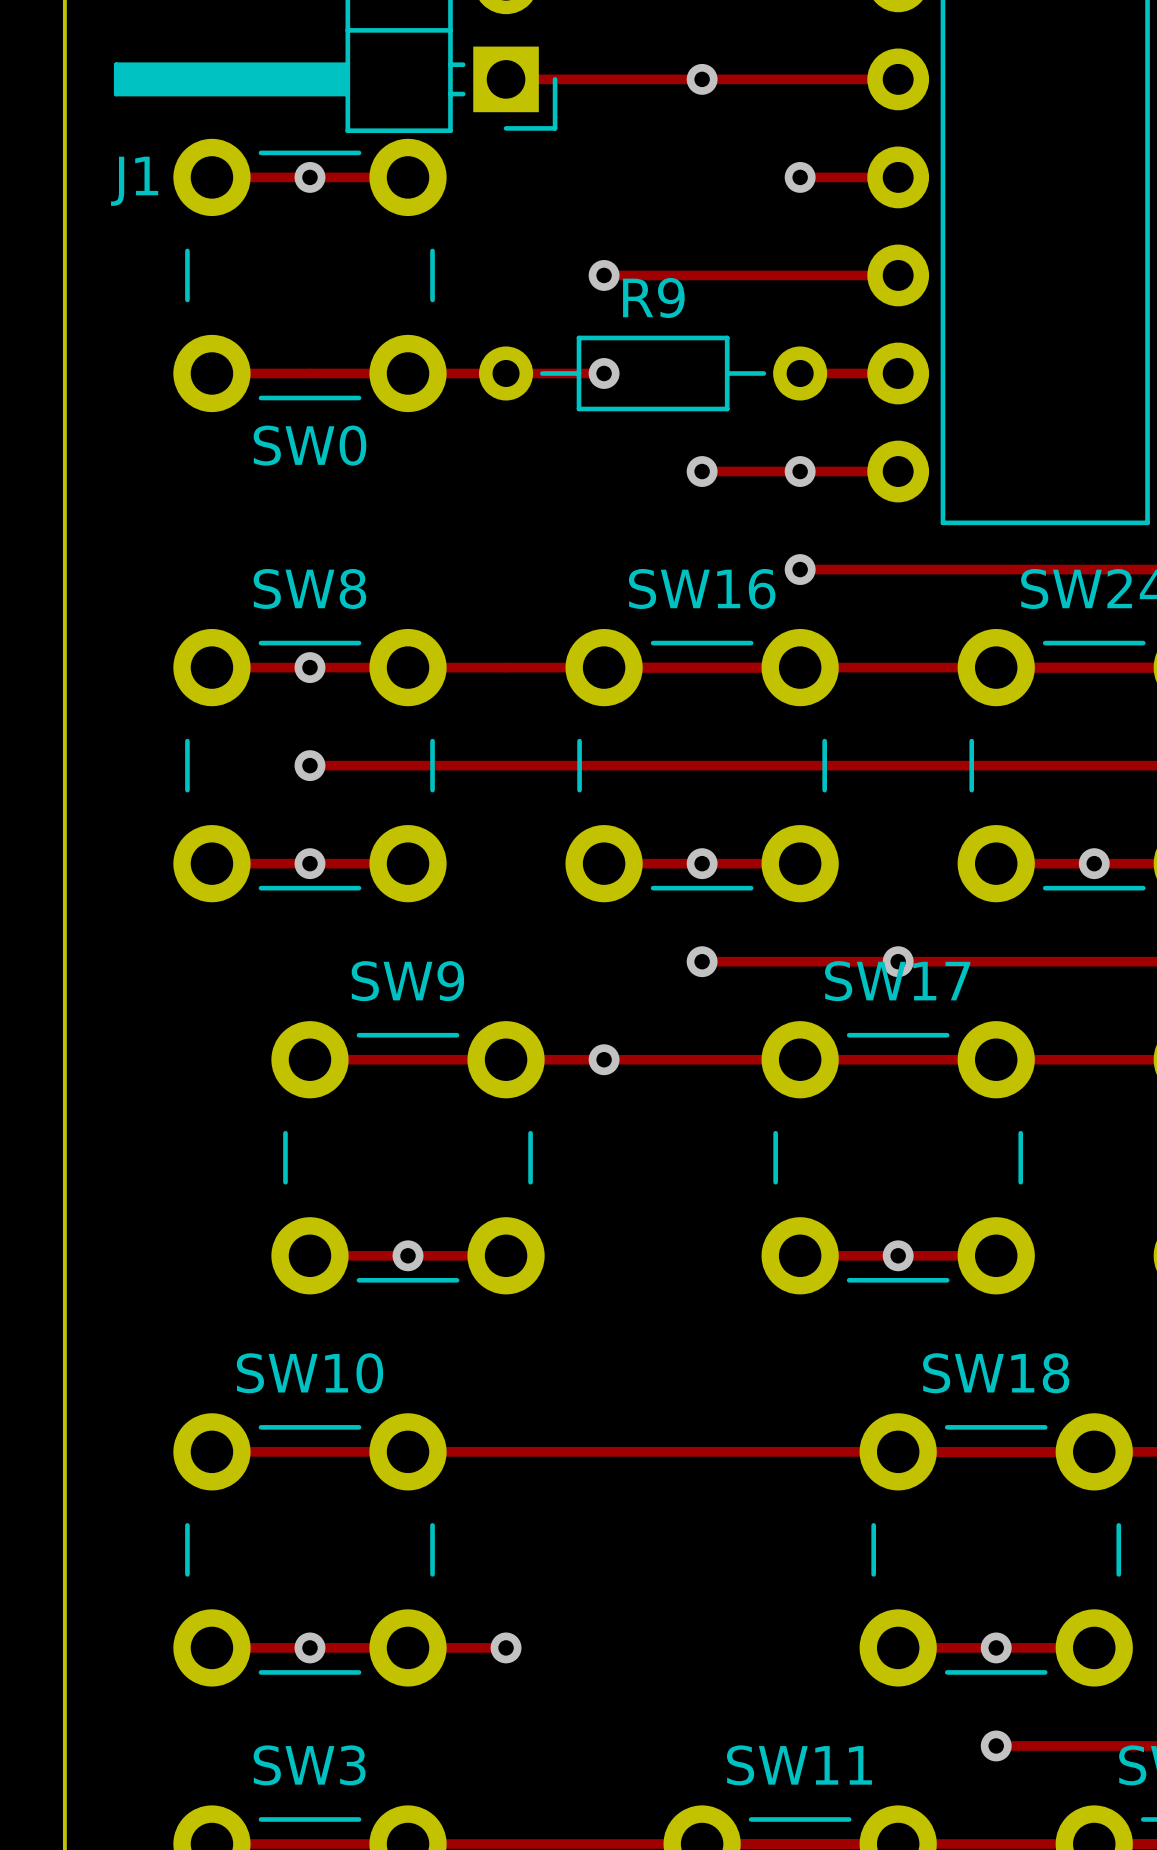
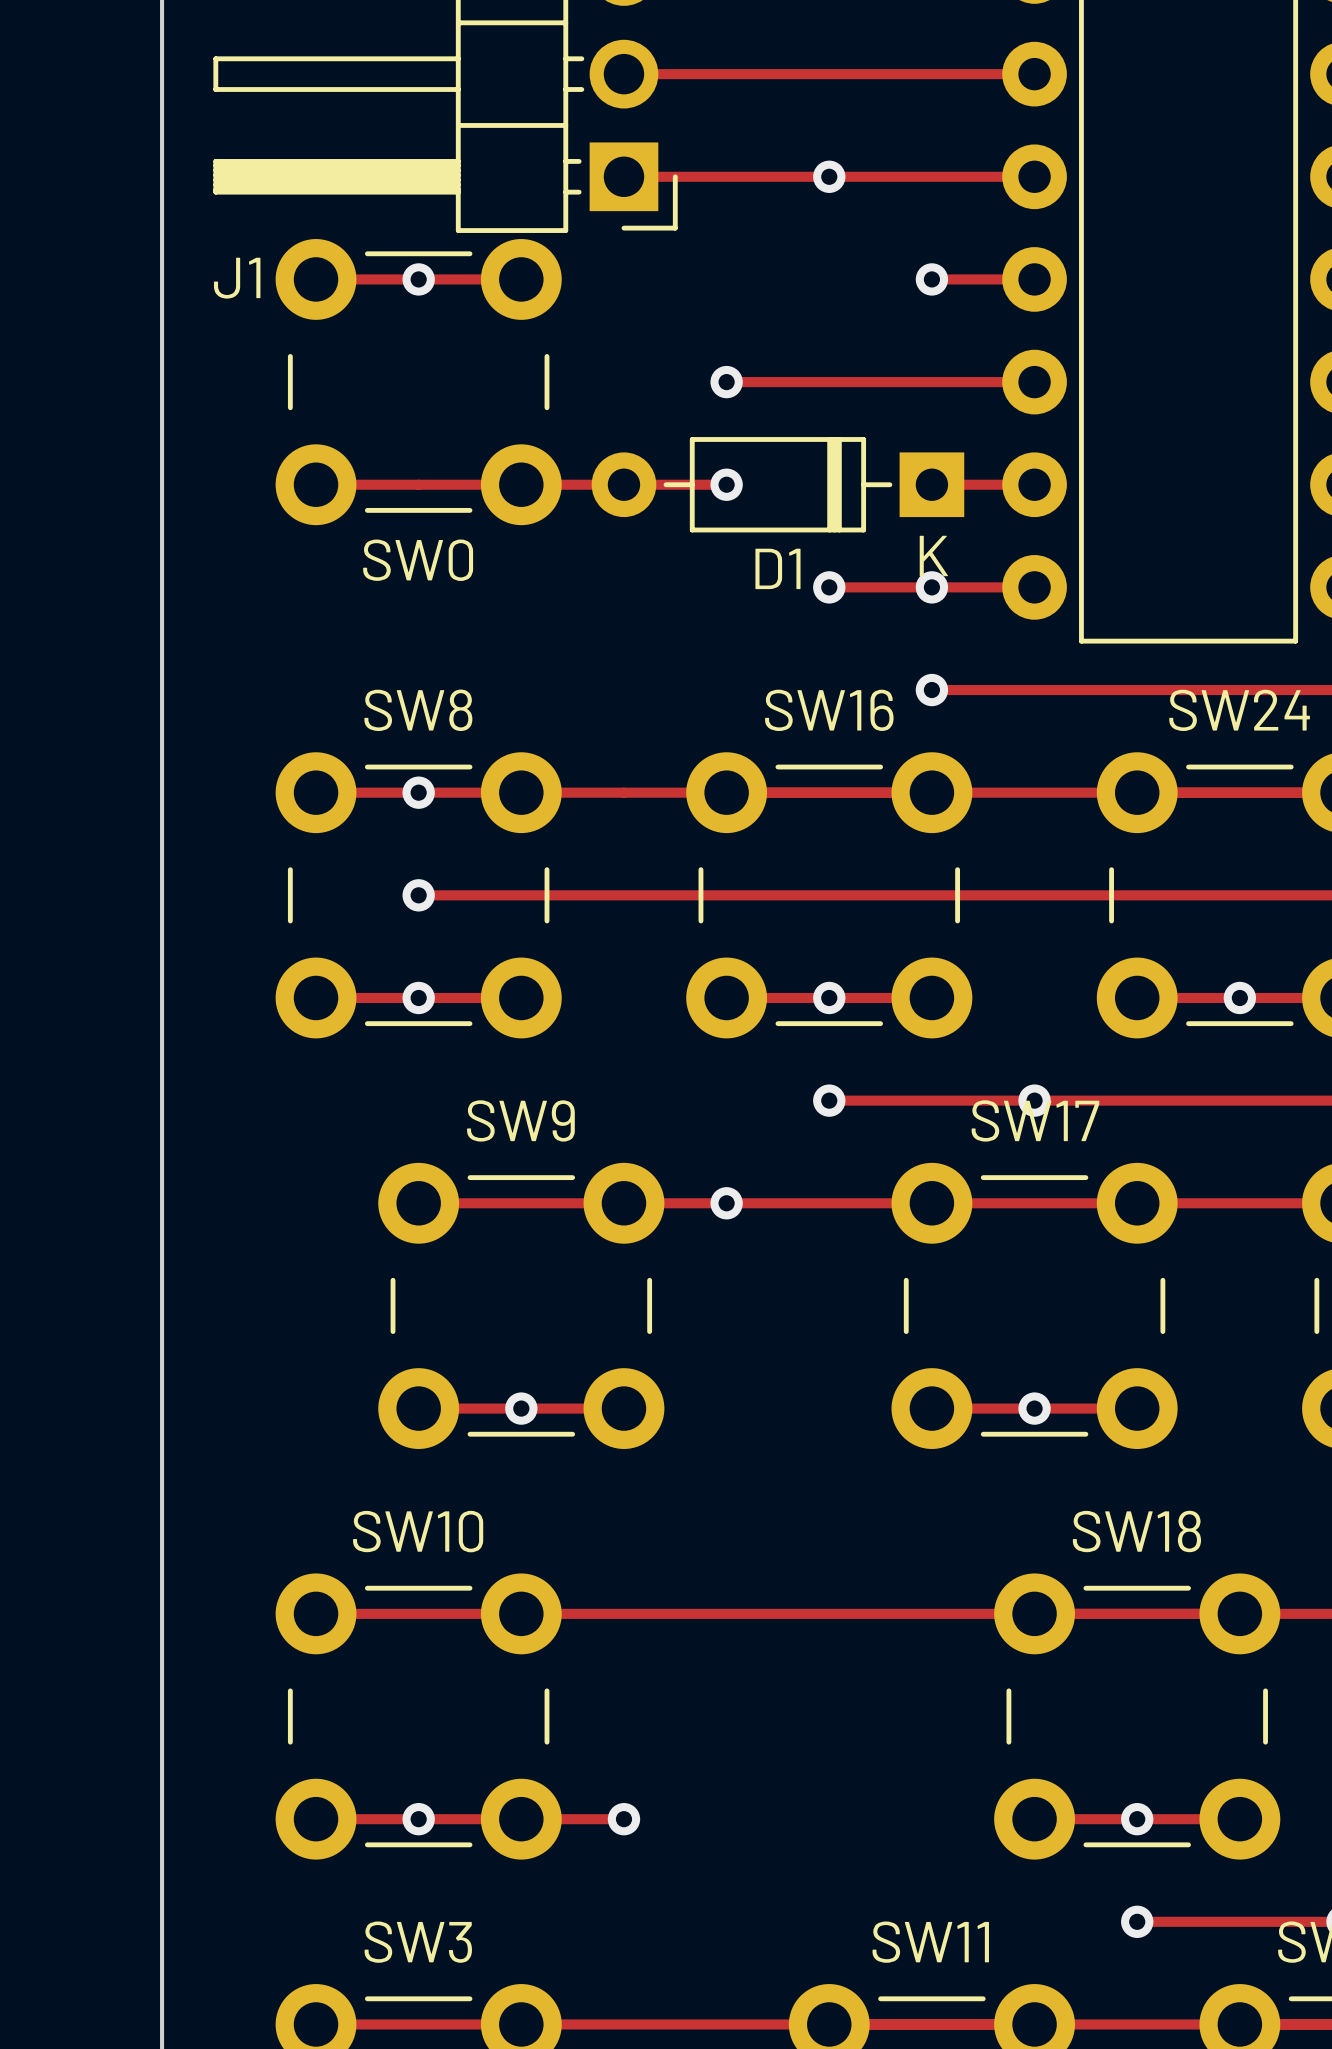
R9: (653, 373) -> none
D1: none -> (777, 484)

